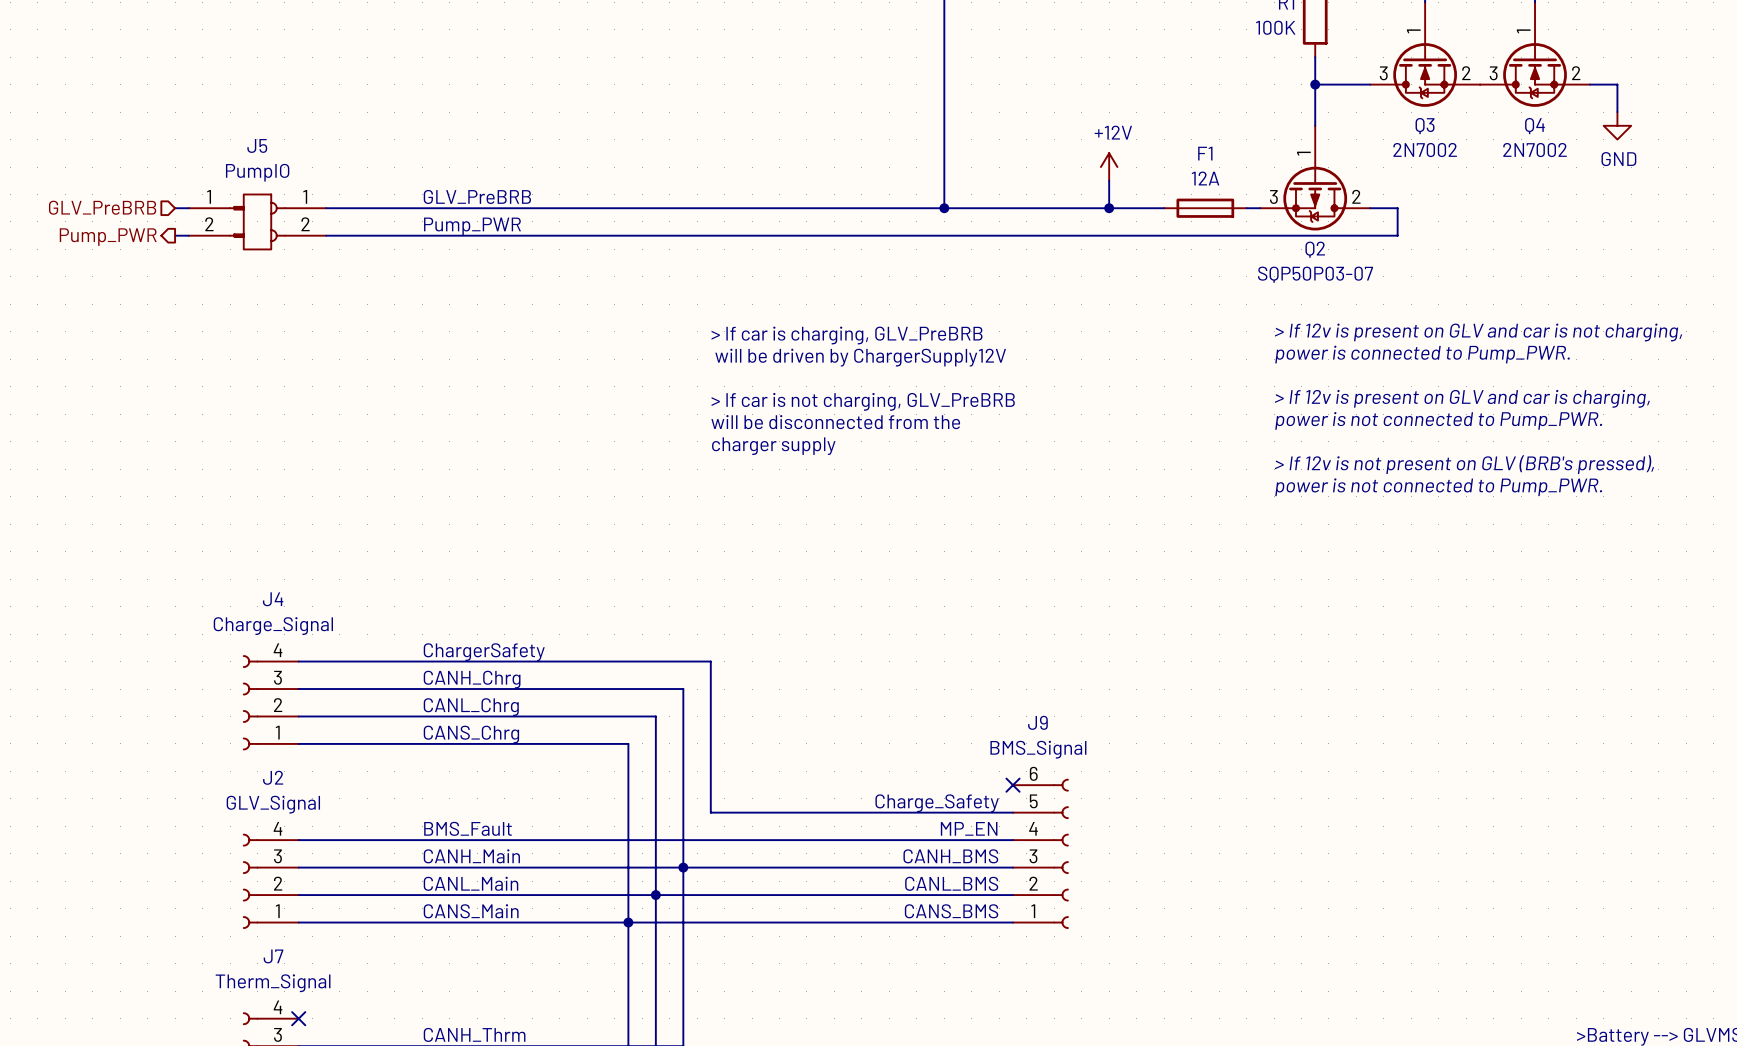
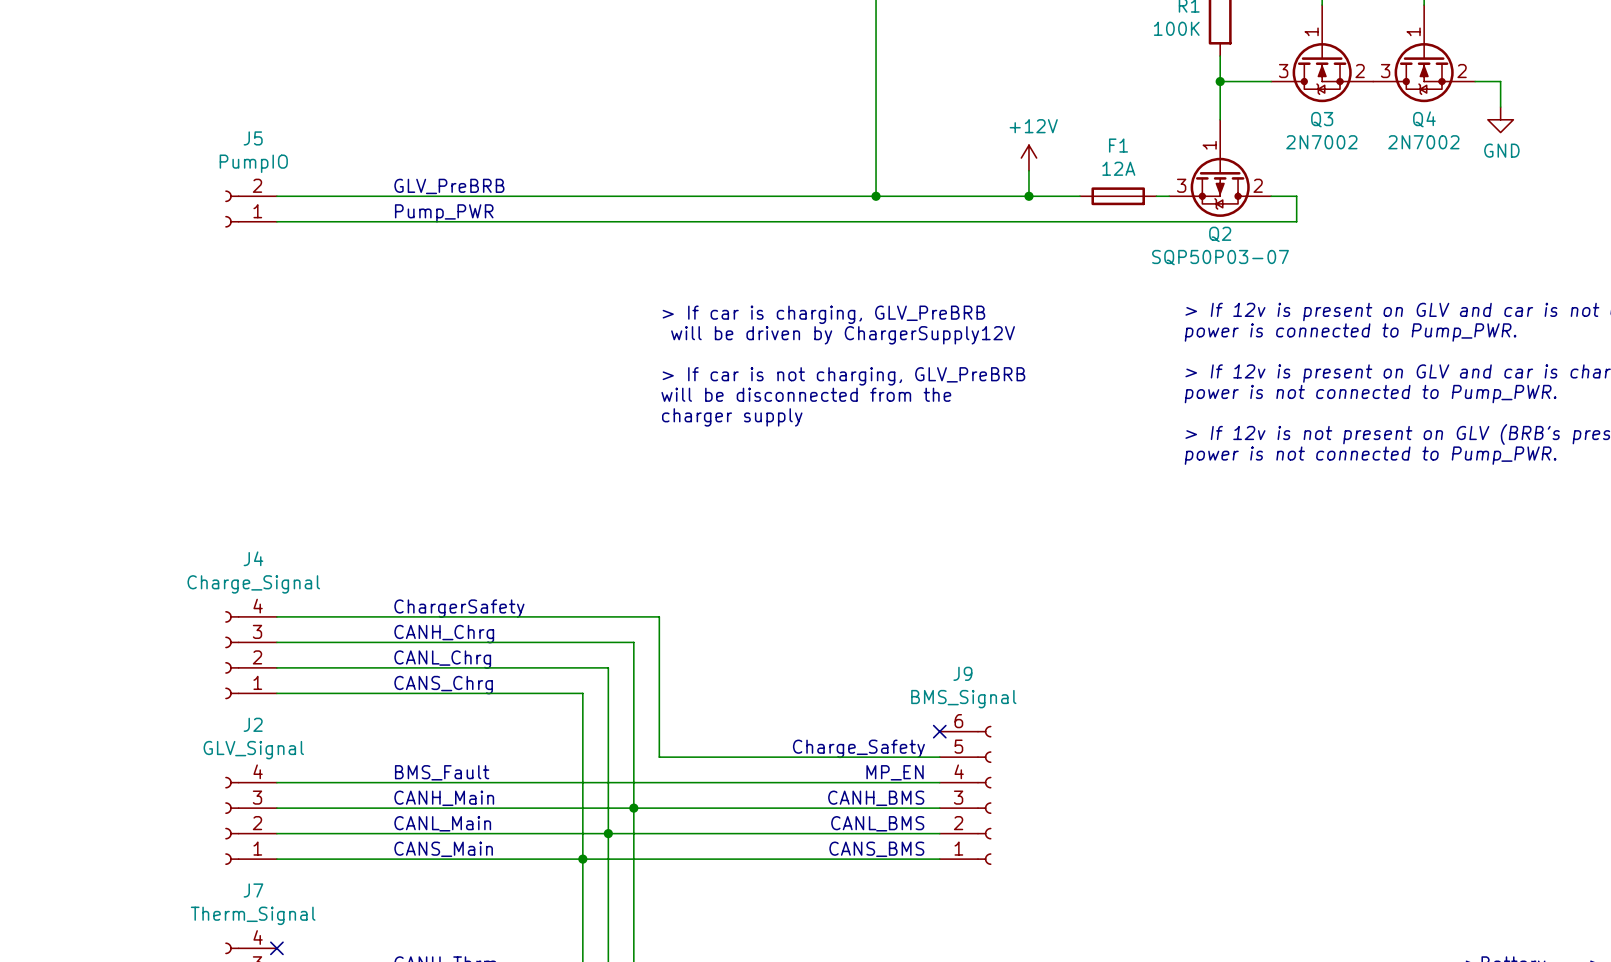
J5 symbol: [188, 194, 327, 250] -> [225, 190, 277, 228]
hierarchical label: GLV_PreBRB (102, 207) -> none
wire: (175, 208) (188, 208) -> none
wire: (175, 235) (188, 235) -> none
hierarchical label: Pump_PWR (108, 237) -> none

